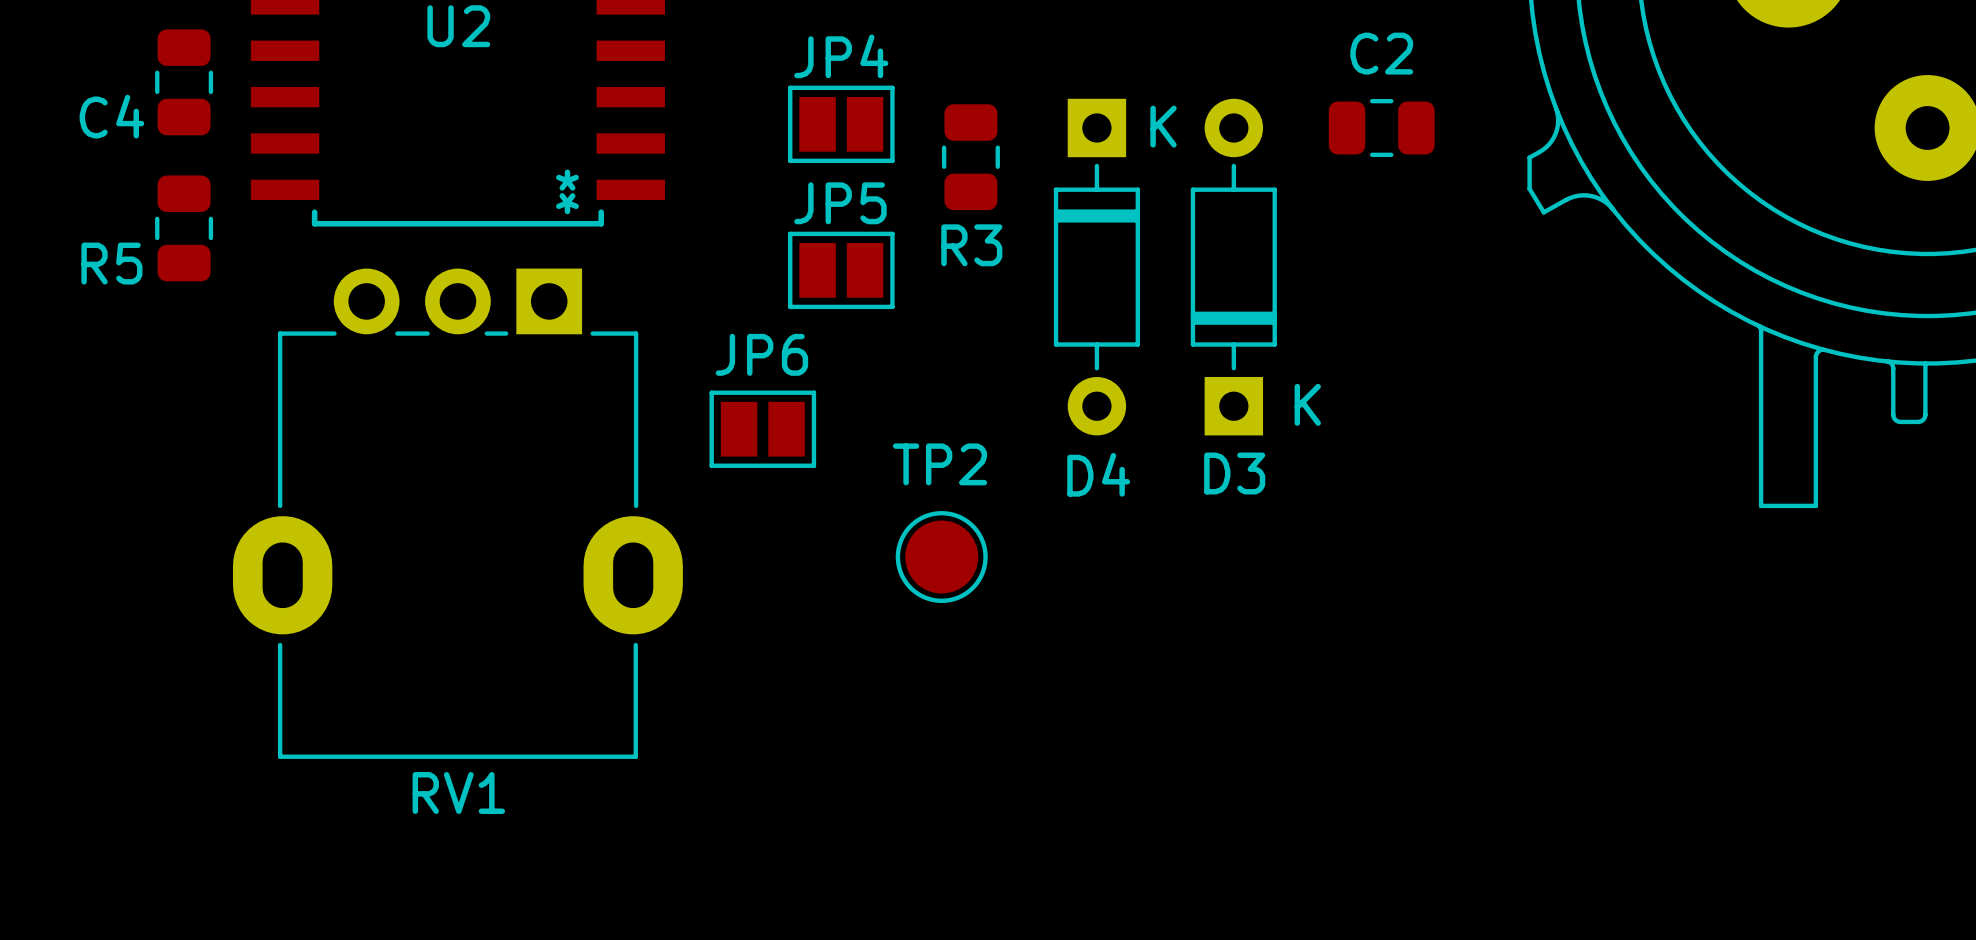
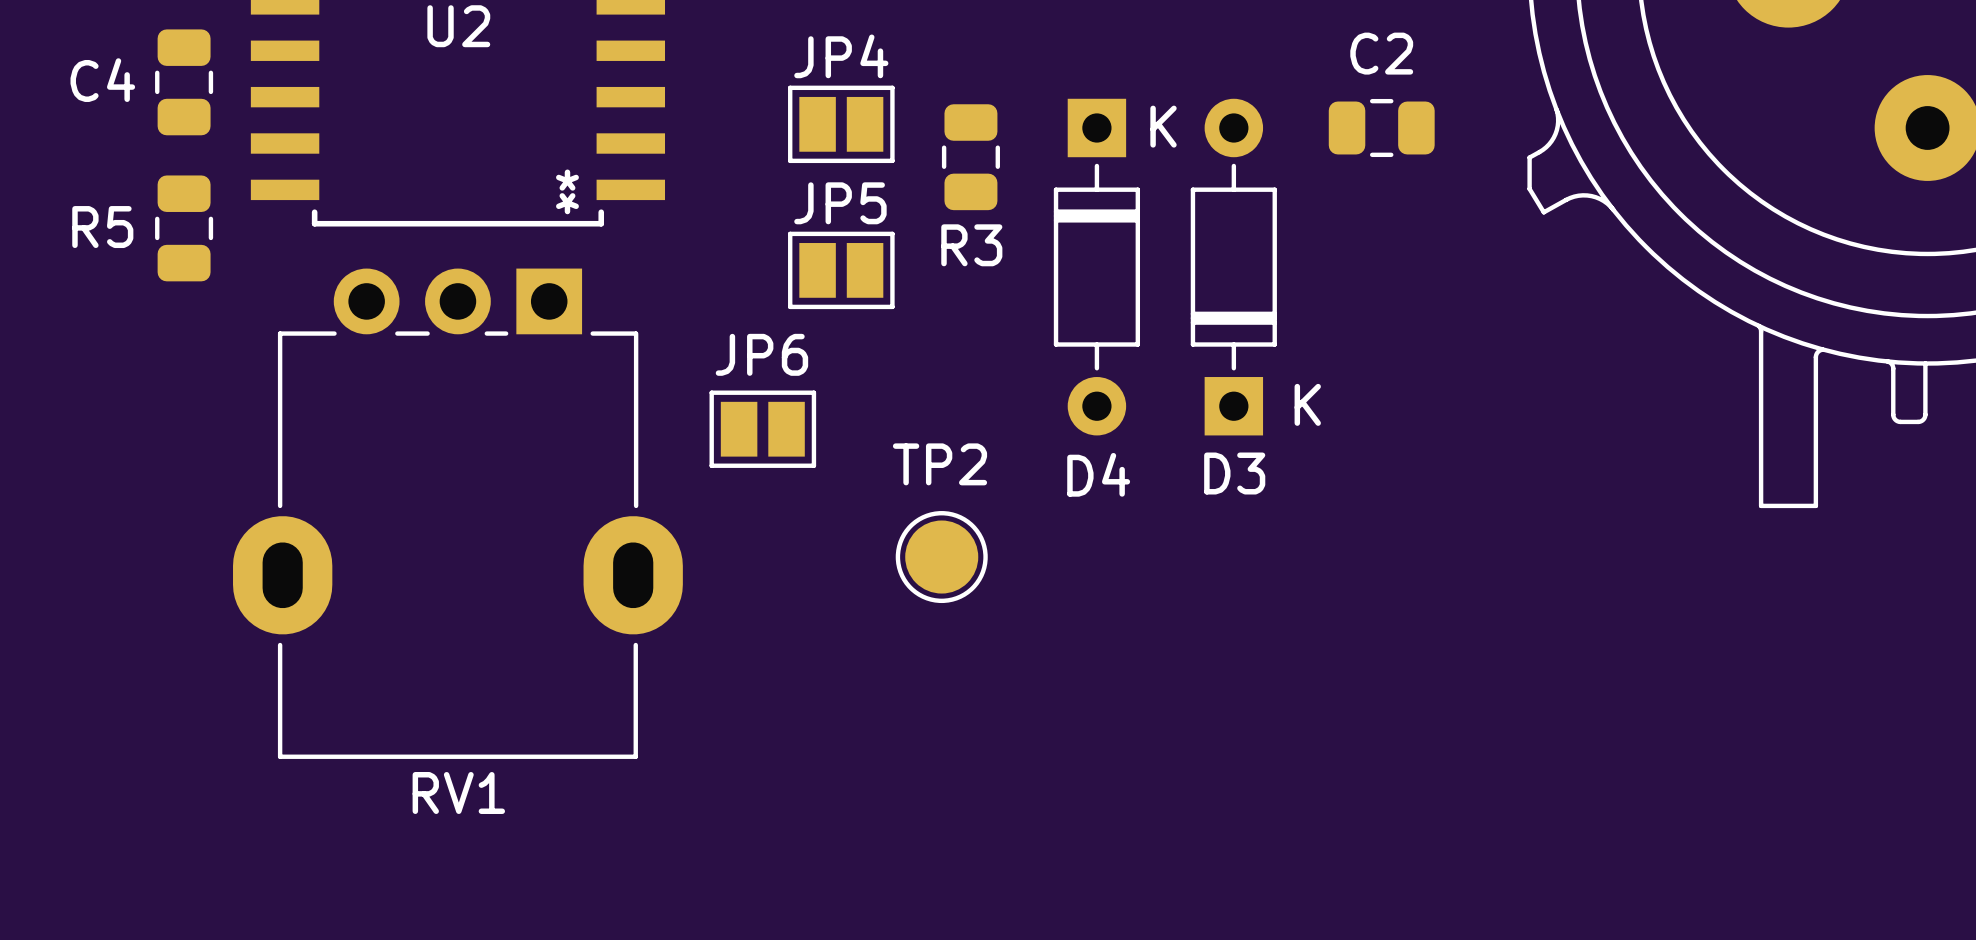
C4 name position: C4 (111, 116) -> C4 (102, 80)
R5 name position: R5 (111, 263) -> R5 (102, 227)

